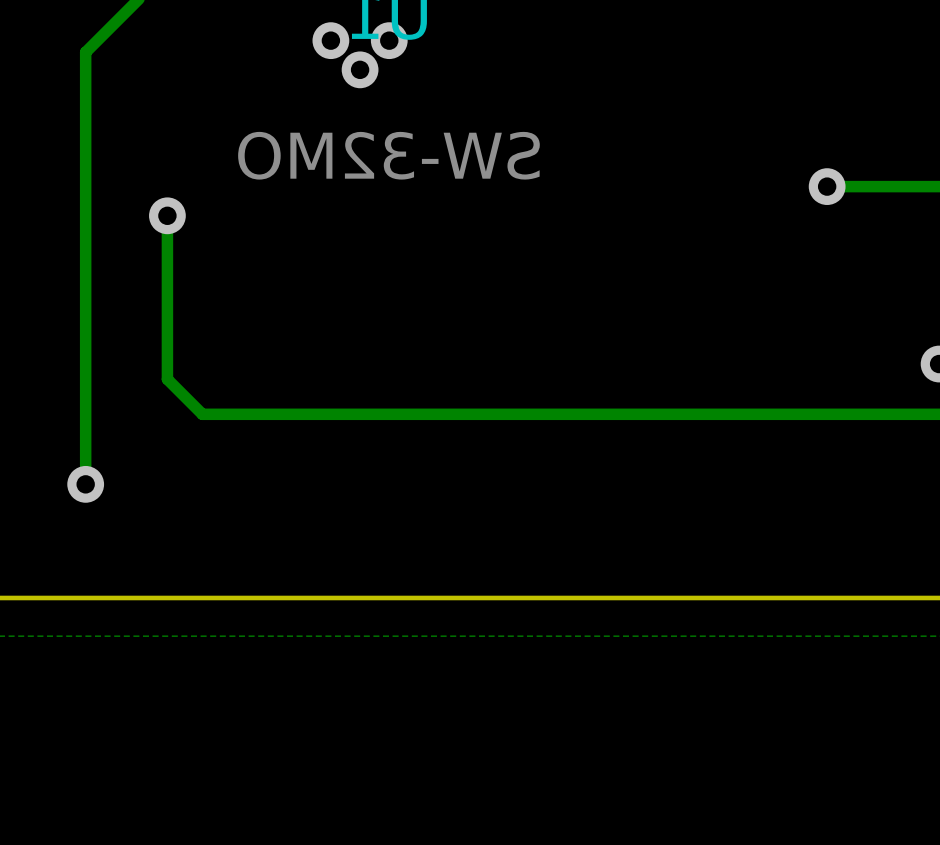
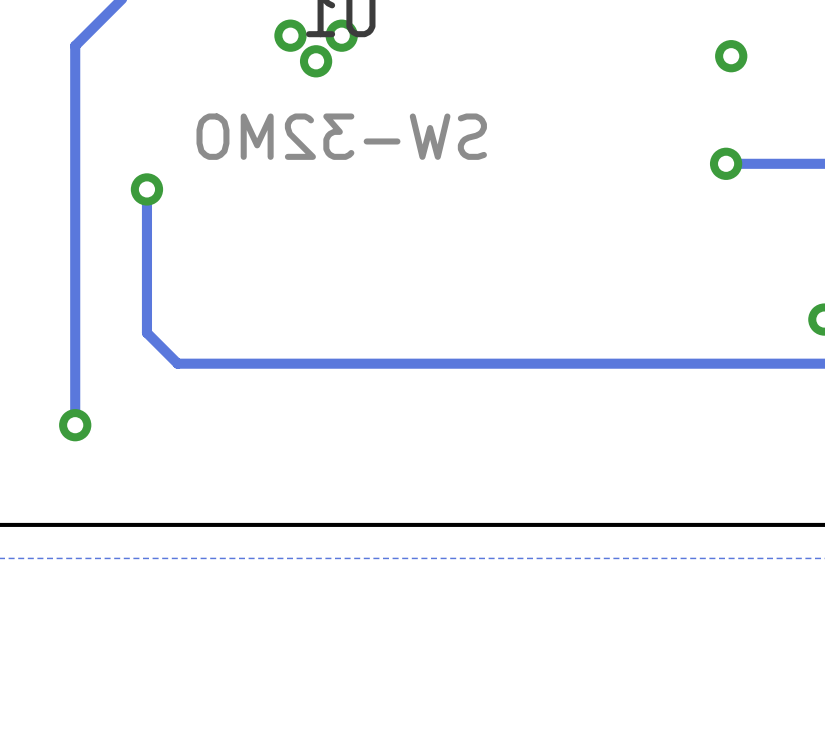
via: none -> (731, 56)

